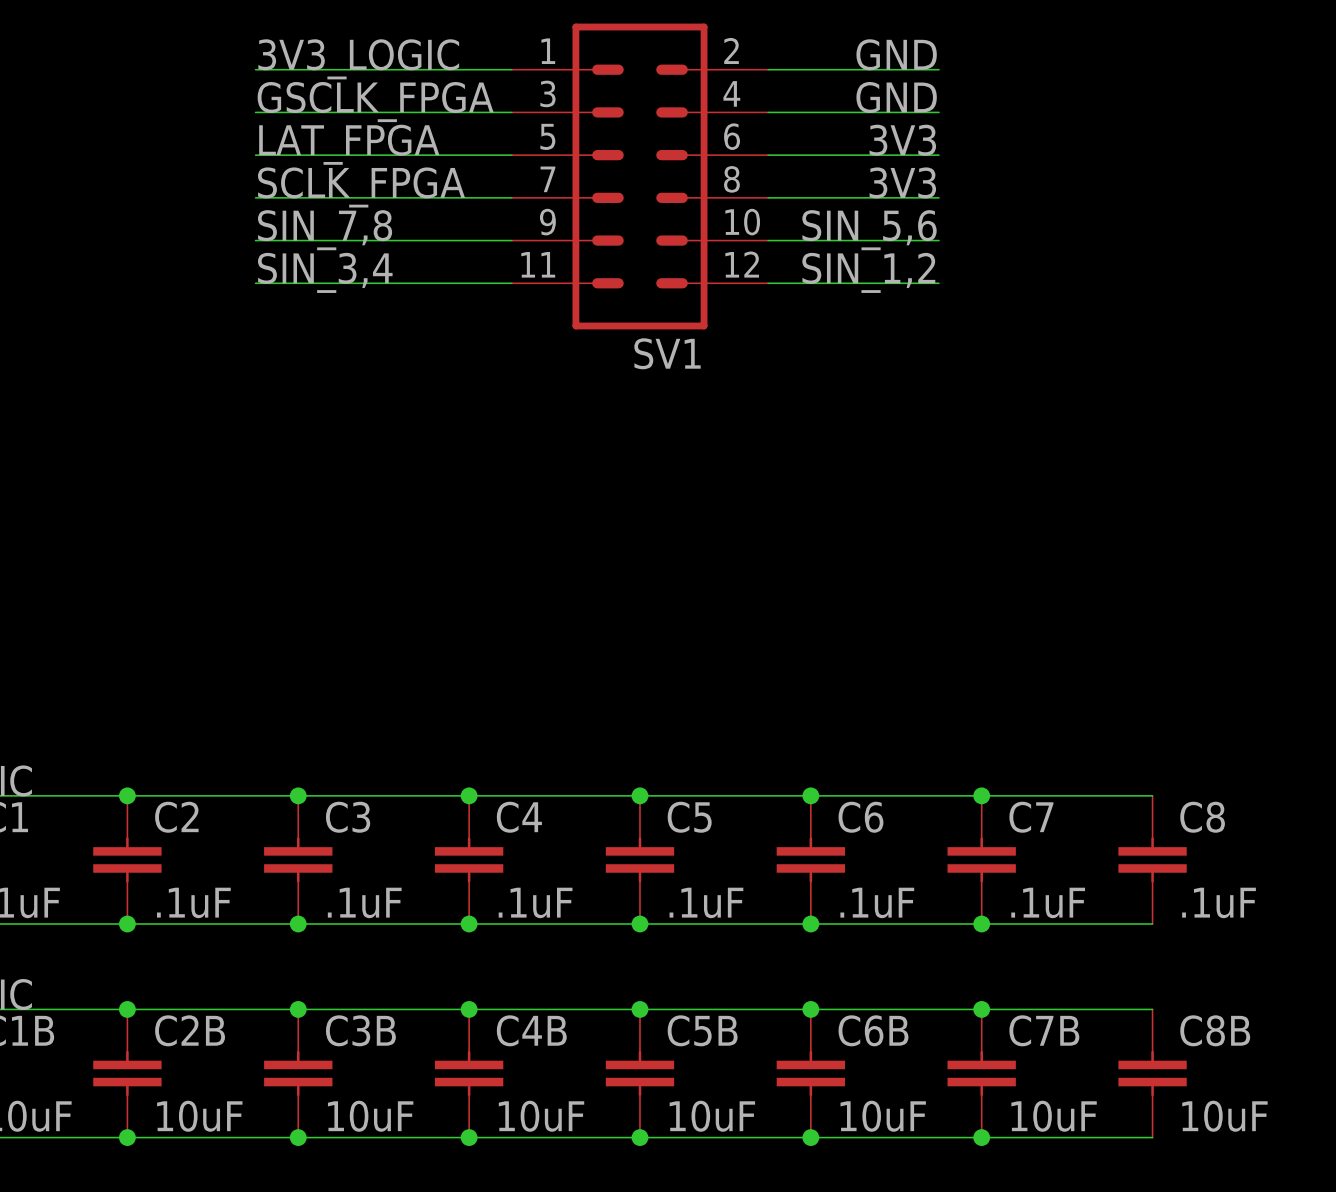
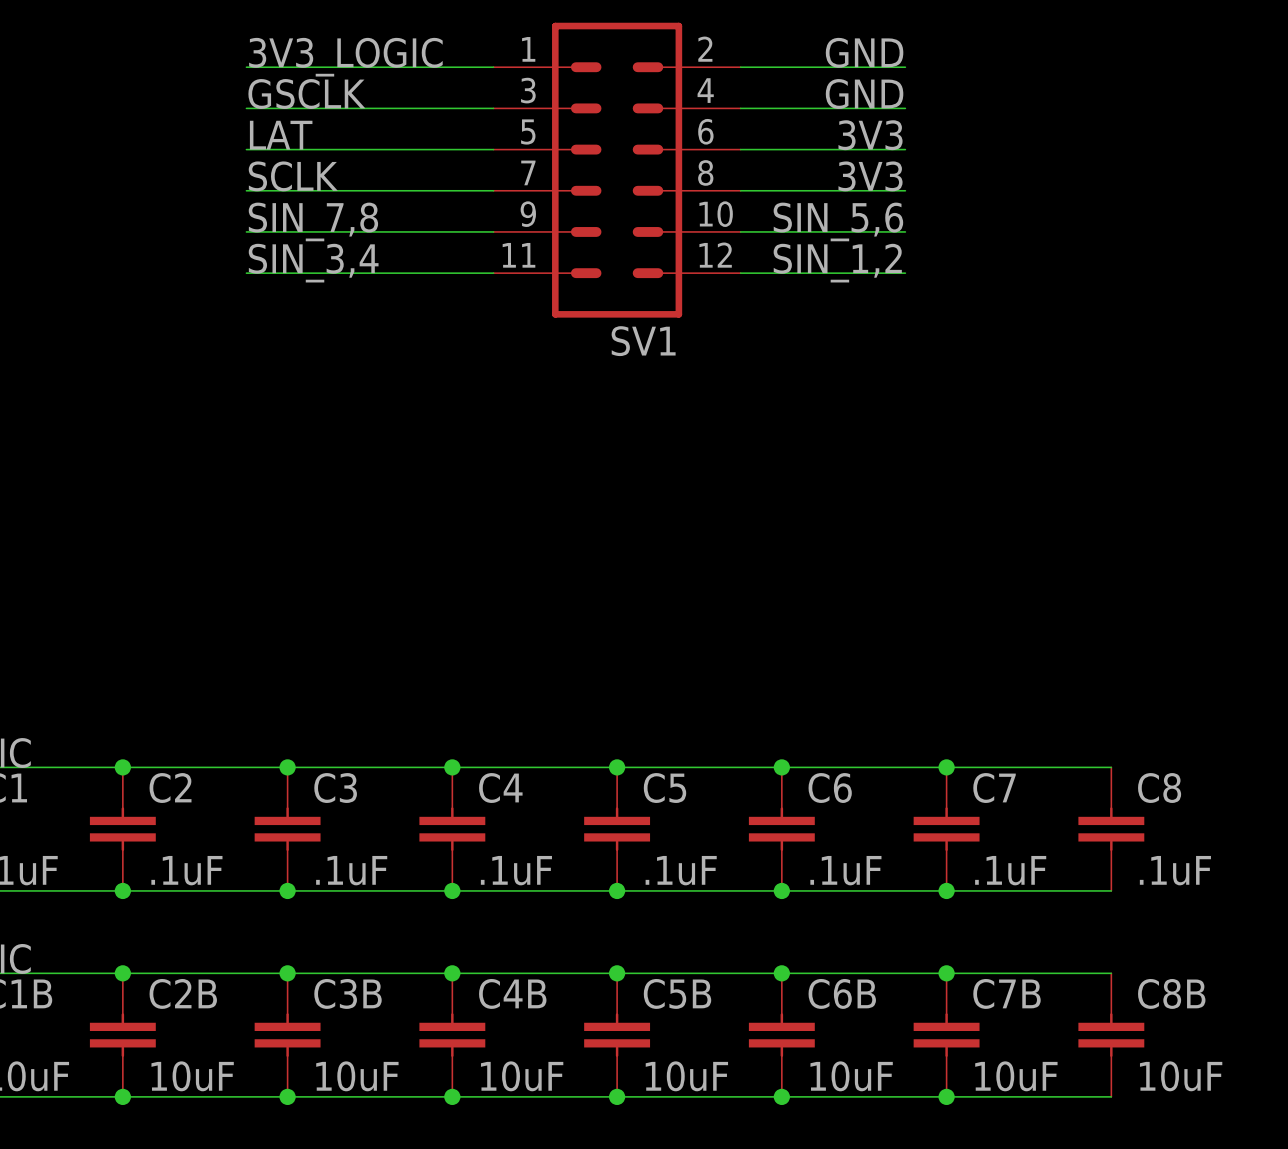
label: GSCLK_FPGA (375, 102) -> GSCLK (306, 94)
label: LAT_FPGA (349, 144) -> LAT (281, 135)
label: SCLK_FPGA (361, 187) -> SCLK (293, 176)

